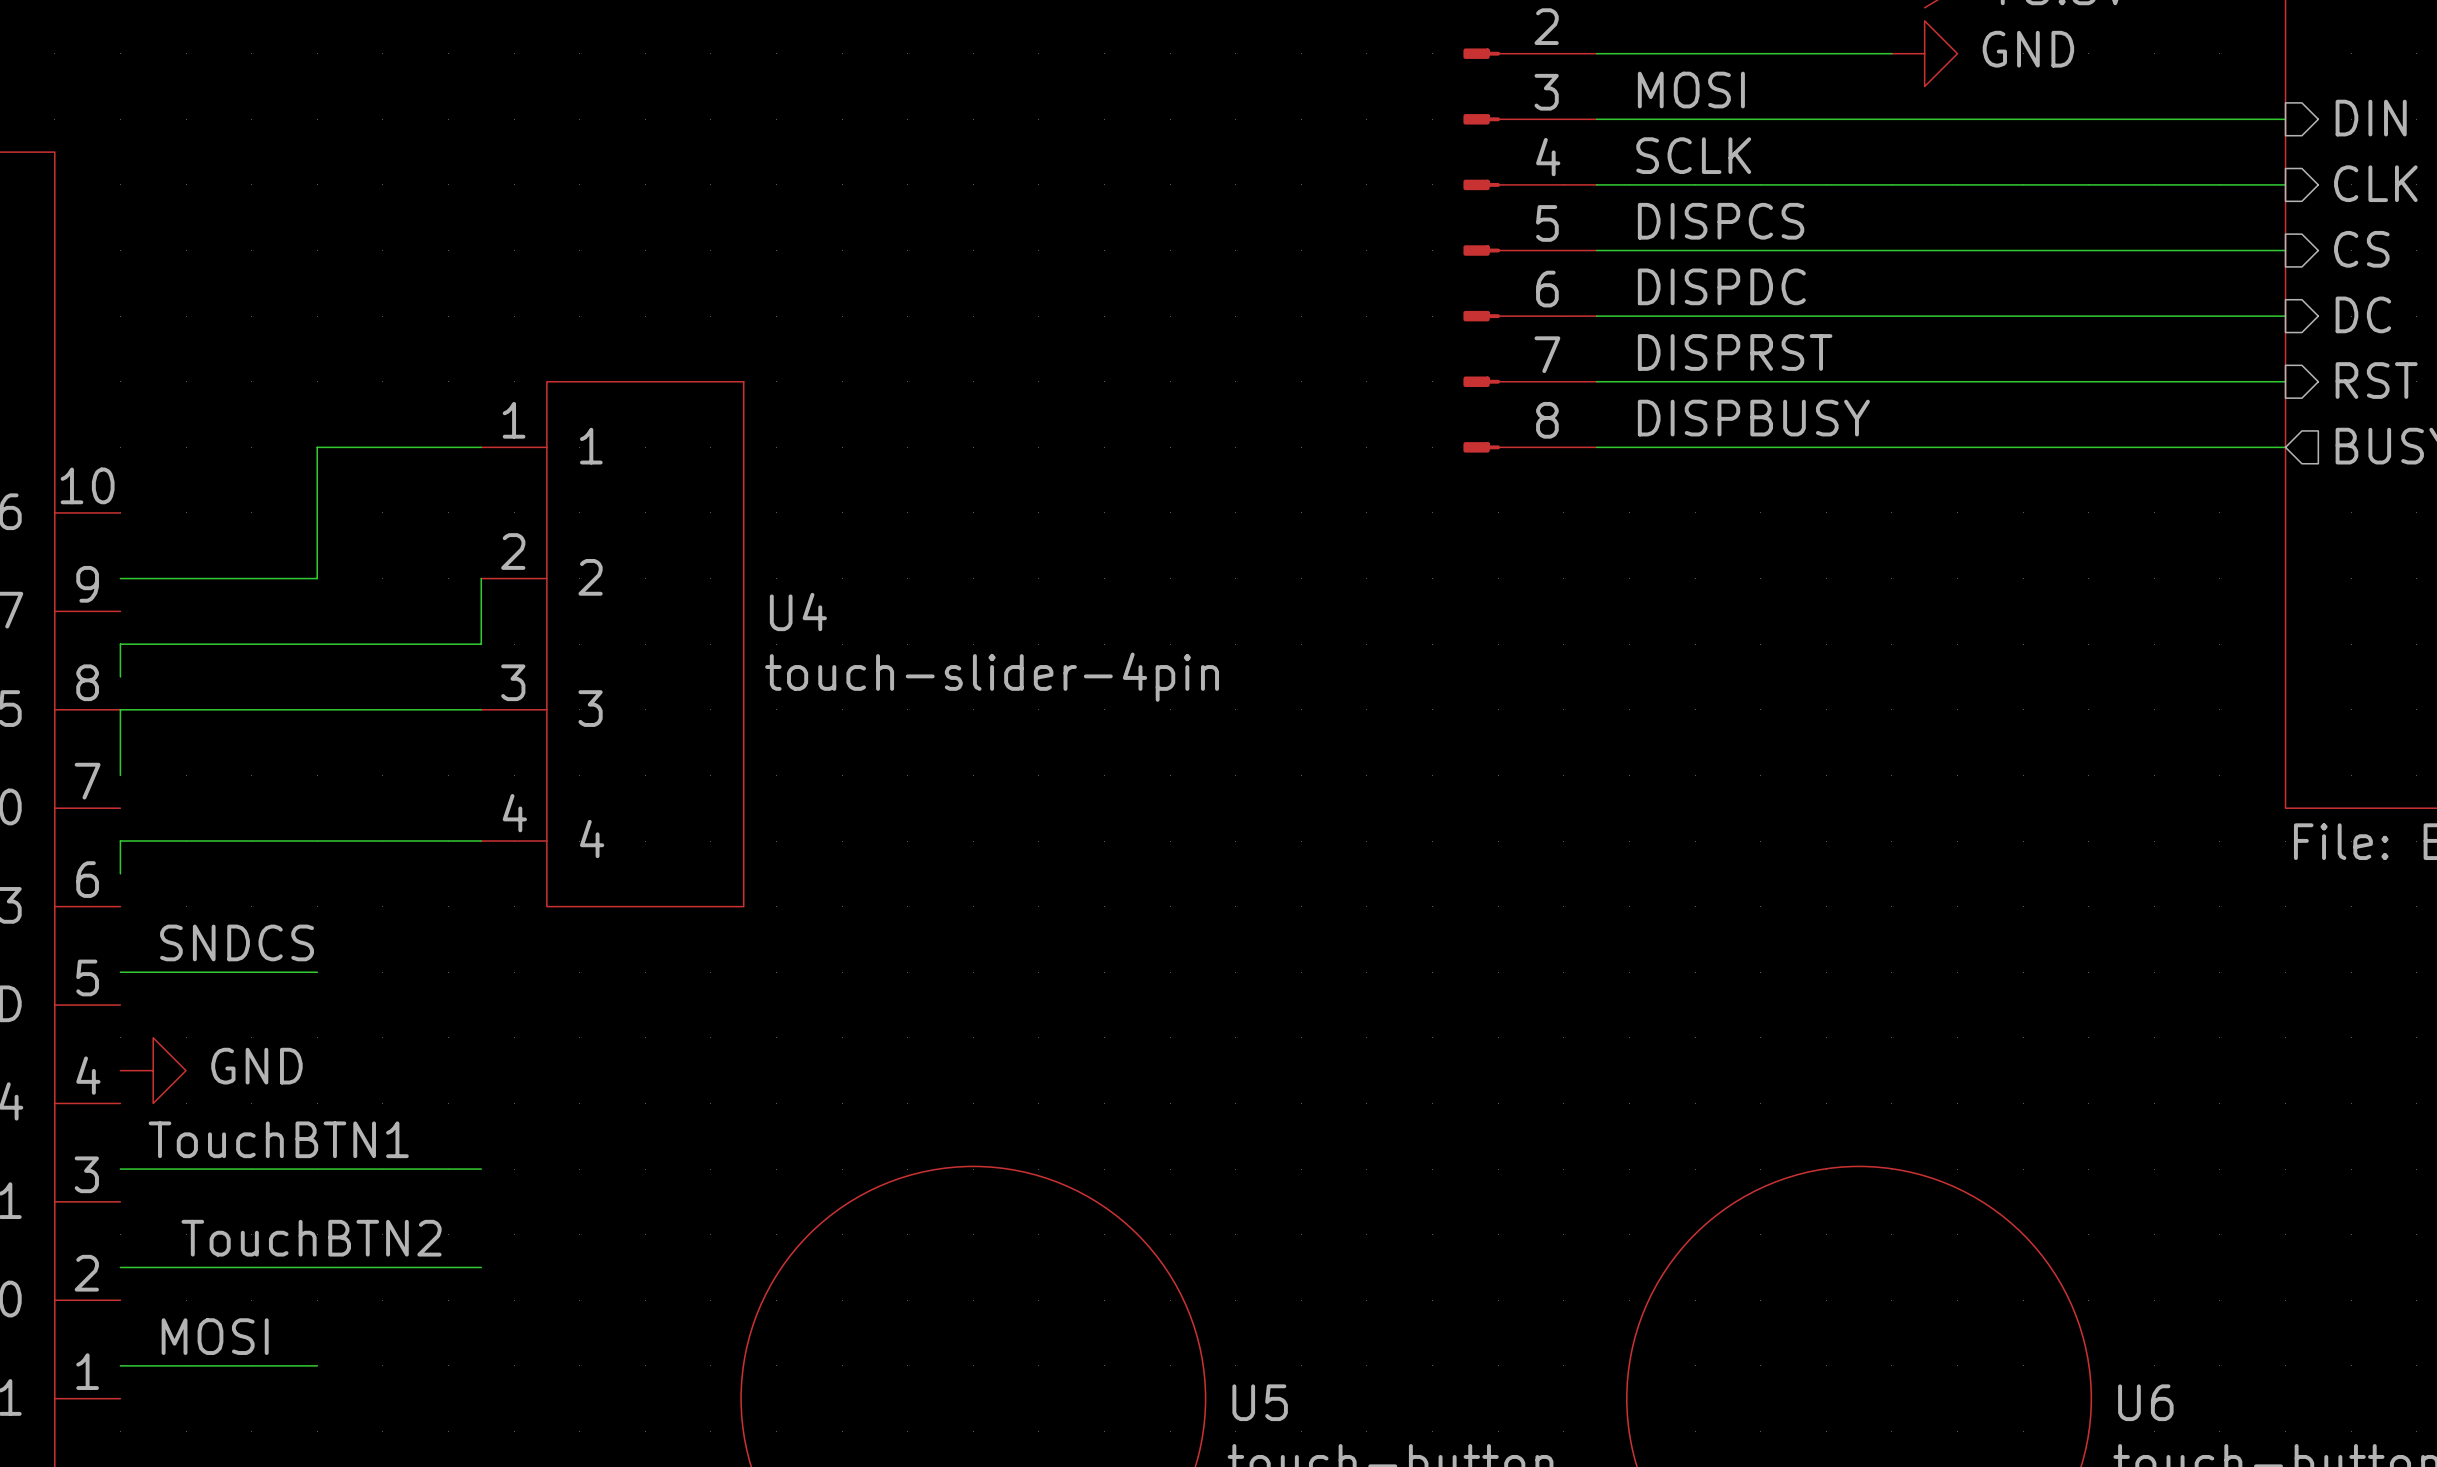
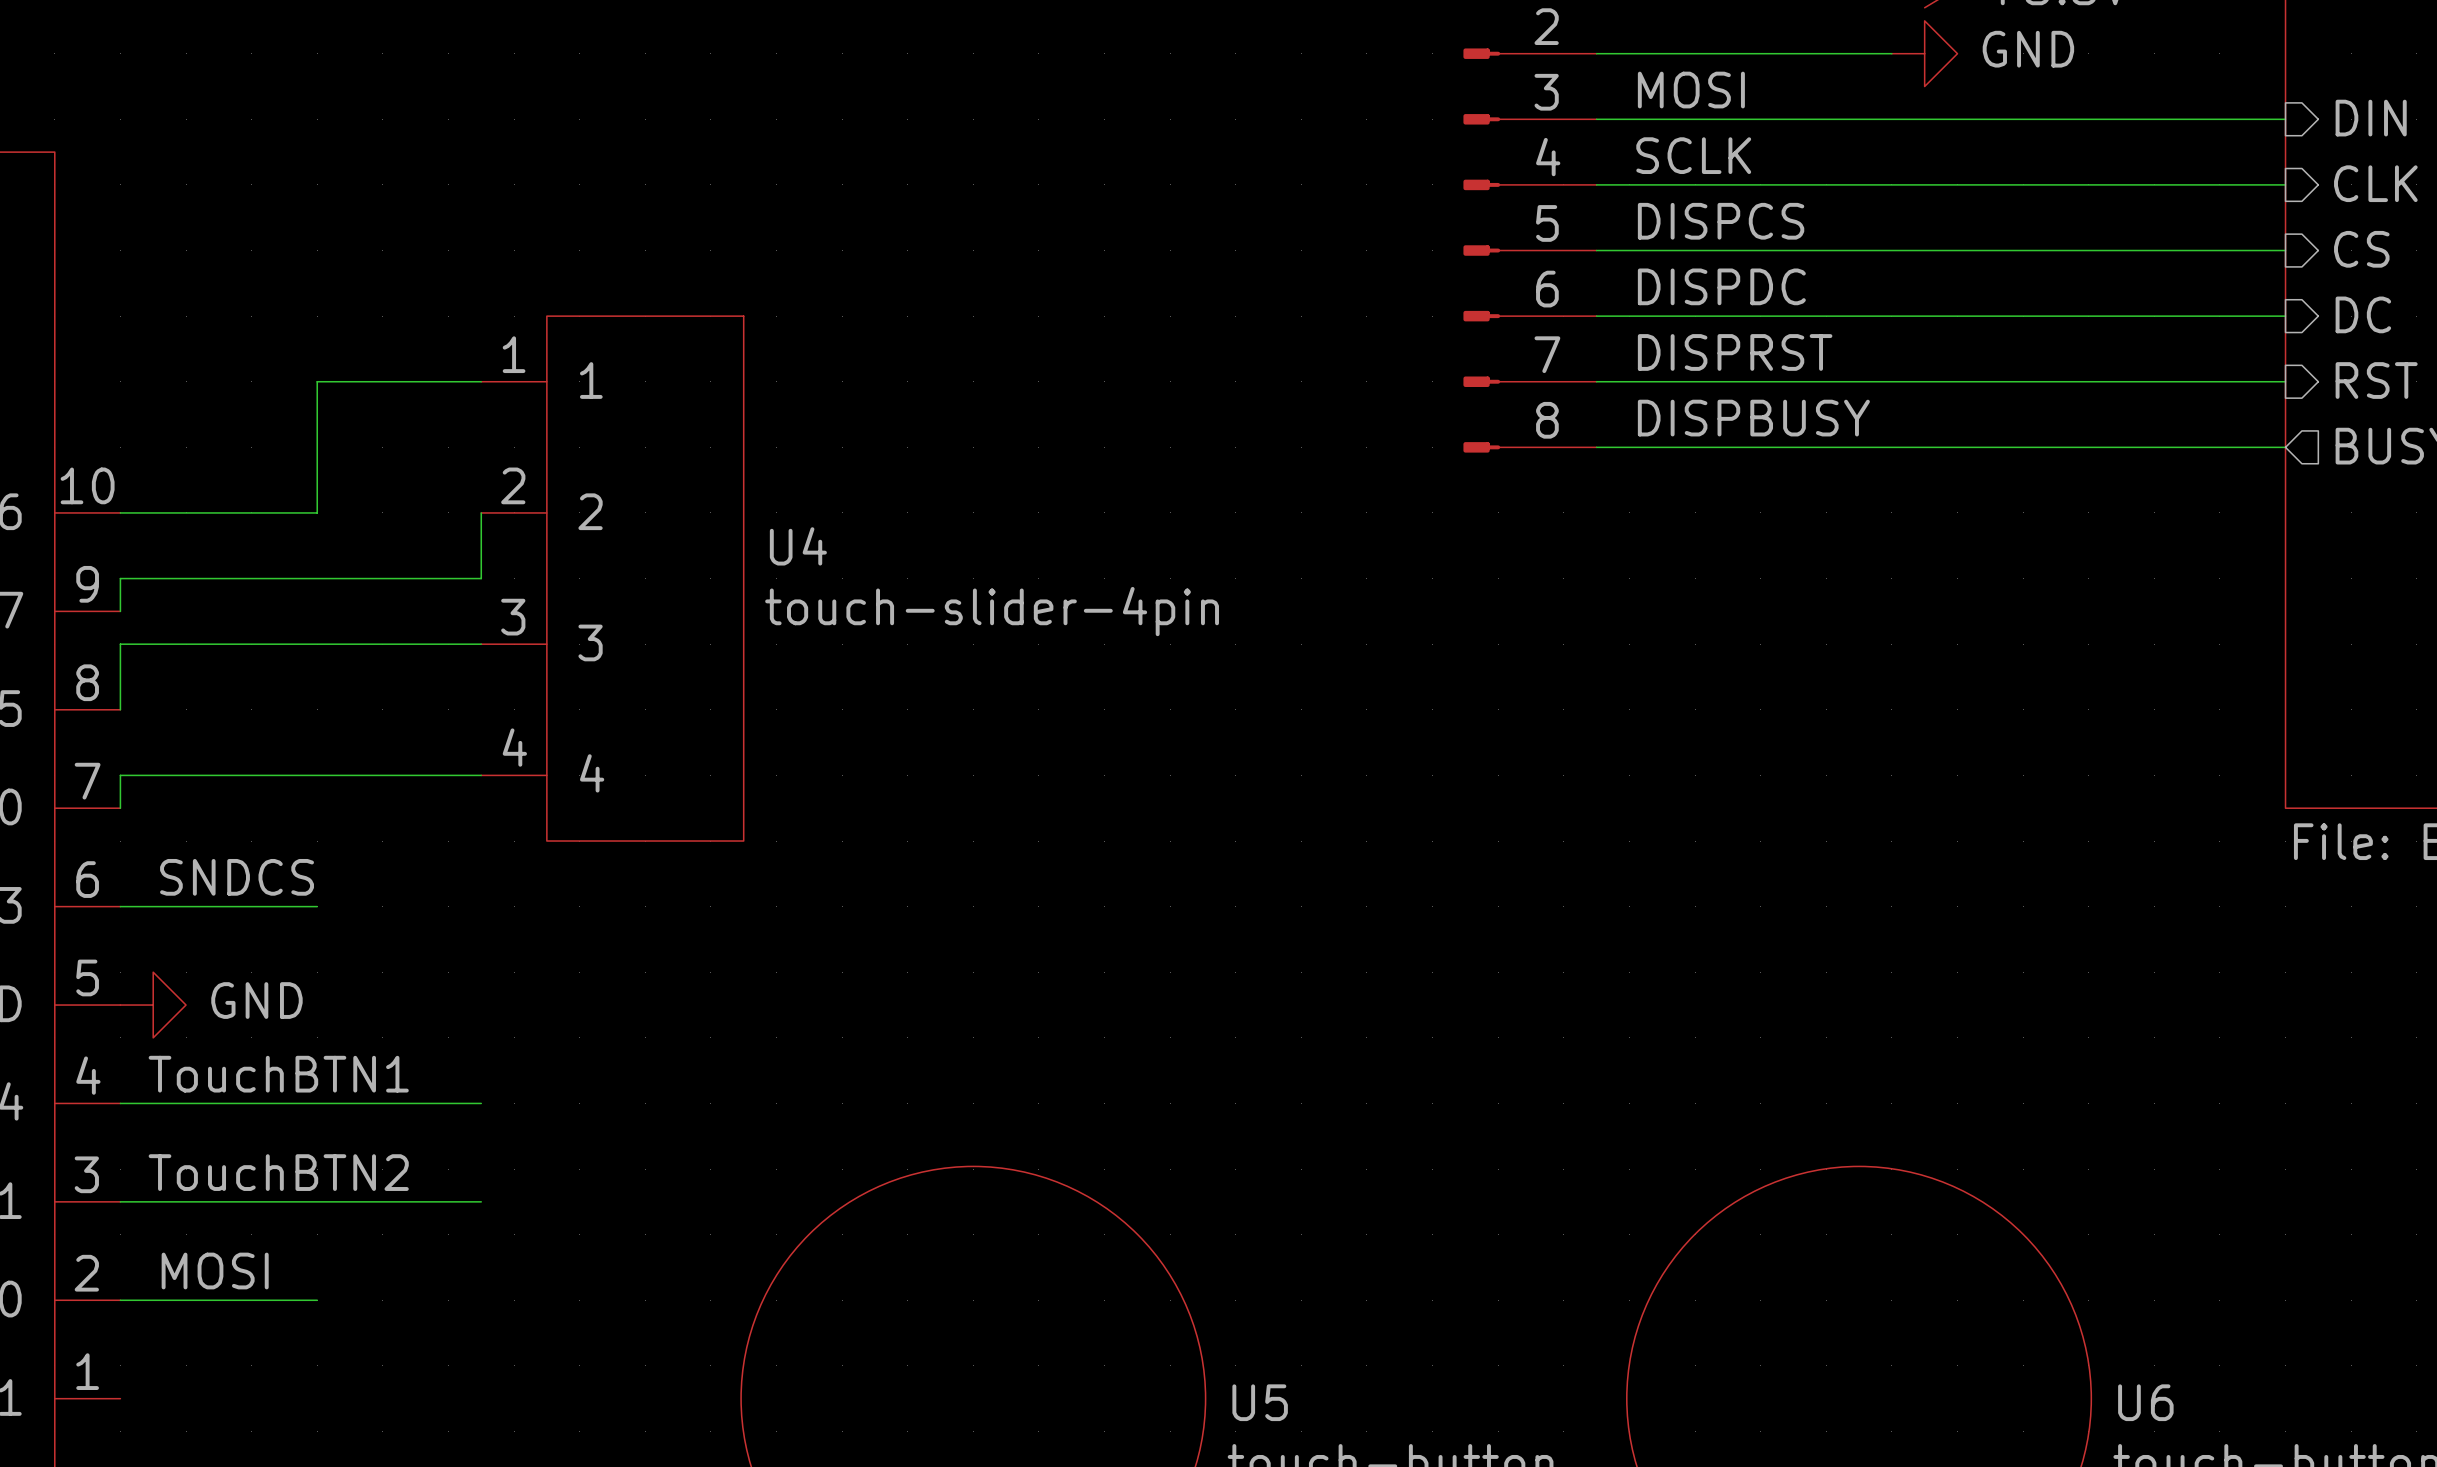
wire: (317, 447) (481, 447) -> (317, 447) (317, 381) (481, 381)
wire: none -> (120, 512) (317, 512)
wire: (317, 512) (317, 578) -> (481, 512) (481, 578) (317, 578)
wire: none -> (120, 578) (120, 611)
wire: (481, 578) (481, 644) -> none
U4 position: (612, 644) -> (612, 578)
wire: none -> (120, 676) (120, 709)
wire: (481, 709) (120, 709) (120, 775) -> none
wire: (481, 841) (120, 841) (120, 873) -> (481, 775) (120, 775) (120, 808)
label position: SNDCS (237, 942) -> SNDCS (237, 877)
wire: (120, 972) (317, 972) -> (120, 906) (317, 906)
power symbol position: GND (153, 1070) -> GND (153, 1005)
label position: TouchBTN1 (278, 1139) -> TouchBTN1 (278, 1074)
wire: (120, 1169) (481, 1169) -> (120, 1103) (481, 1103)
label position: TouchBTN2 (311, 1238) -> TouchBTN2 (278, 1172)
wire: (120, 1267) (481, 1267) -> (120, 1201) (481, 1201)
label position: MOSI (215, 1336) -> MOSI (215, 1271)
wire: (120, 1365) (317, 1365) -> (120, 1300) (317, 1300)

